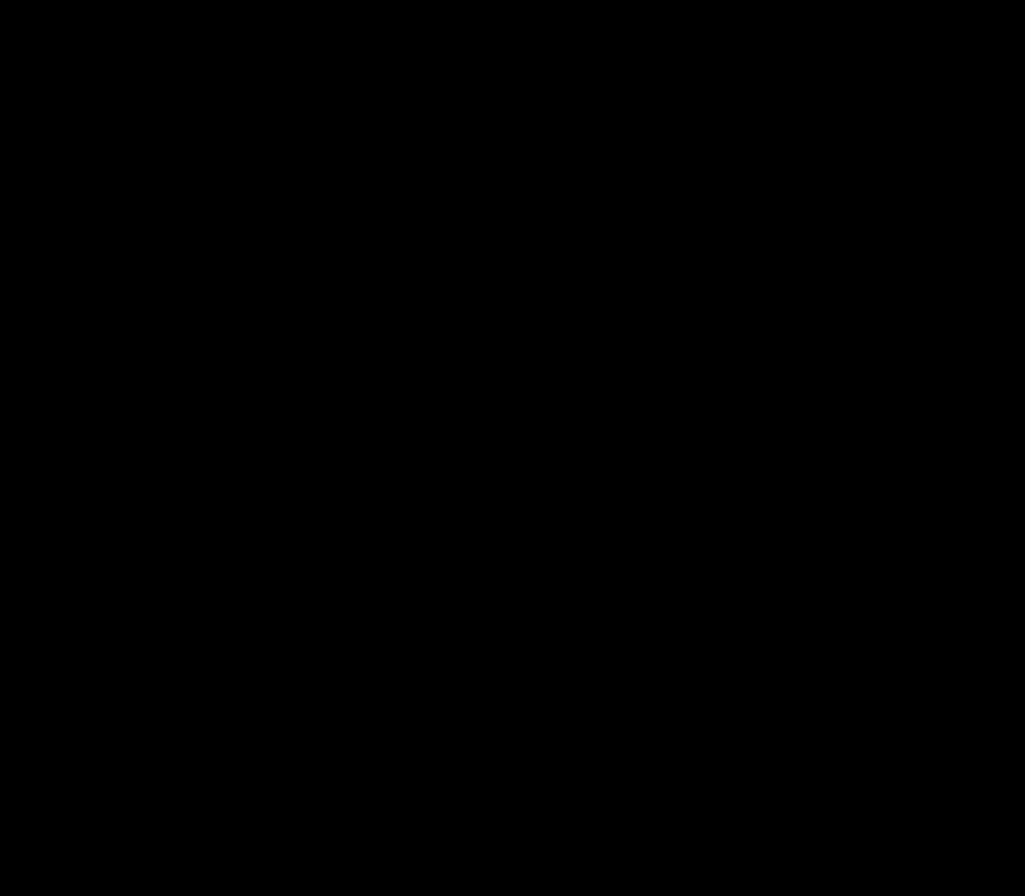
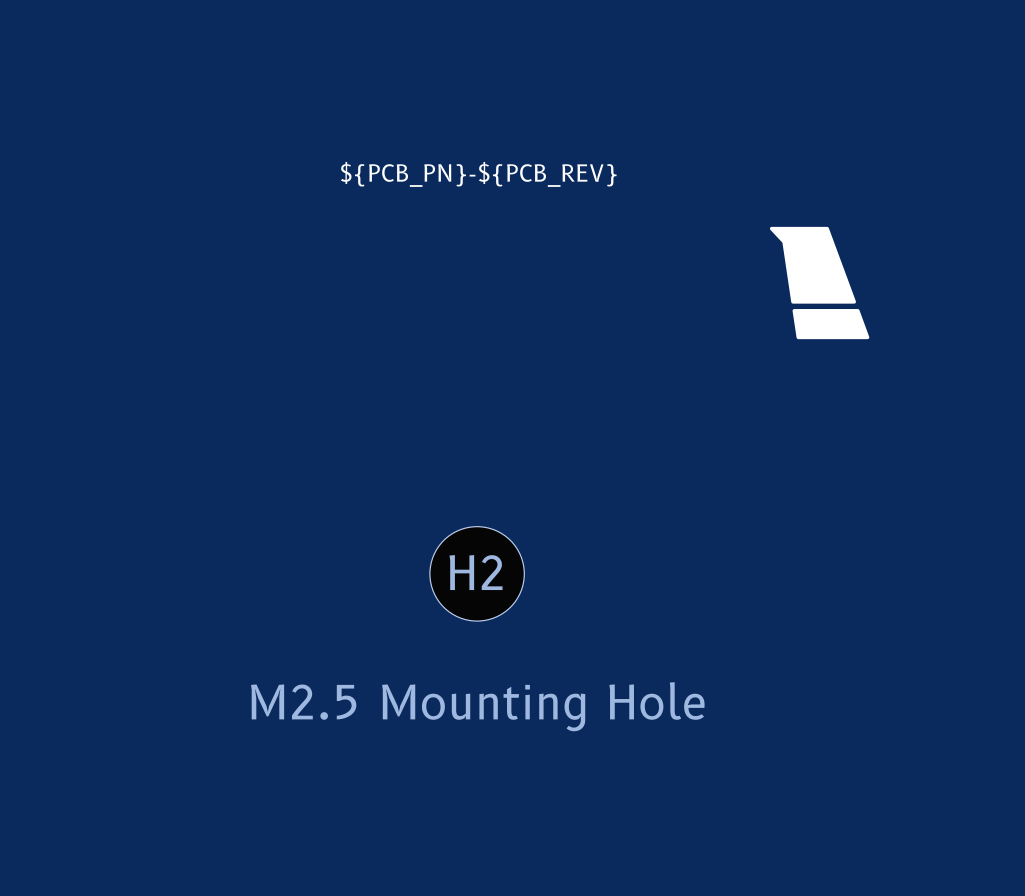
drawing: none -> [340, 161, 617, 187]
drawing: none -> [769, 226, 870, 340]
H2: none -> M2.5 Mounting Hole (477, 573)

